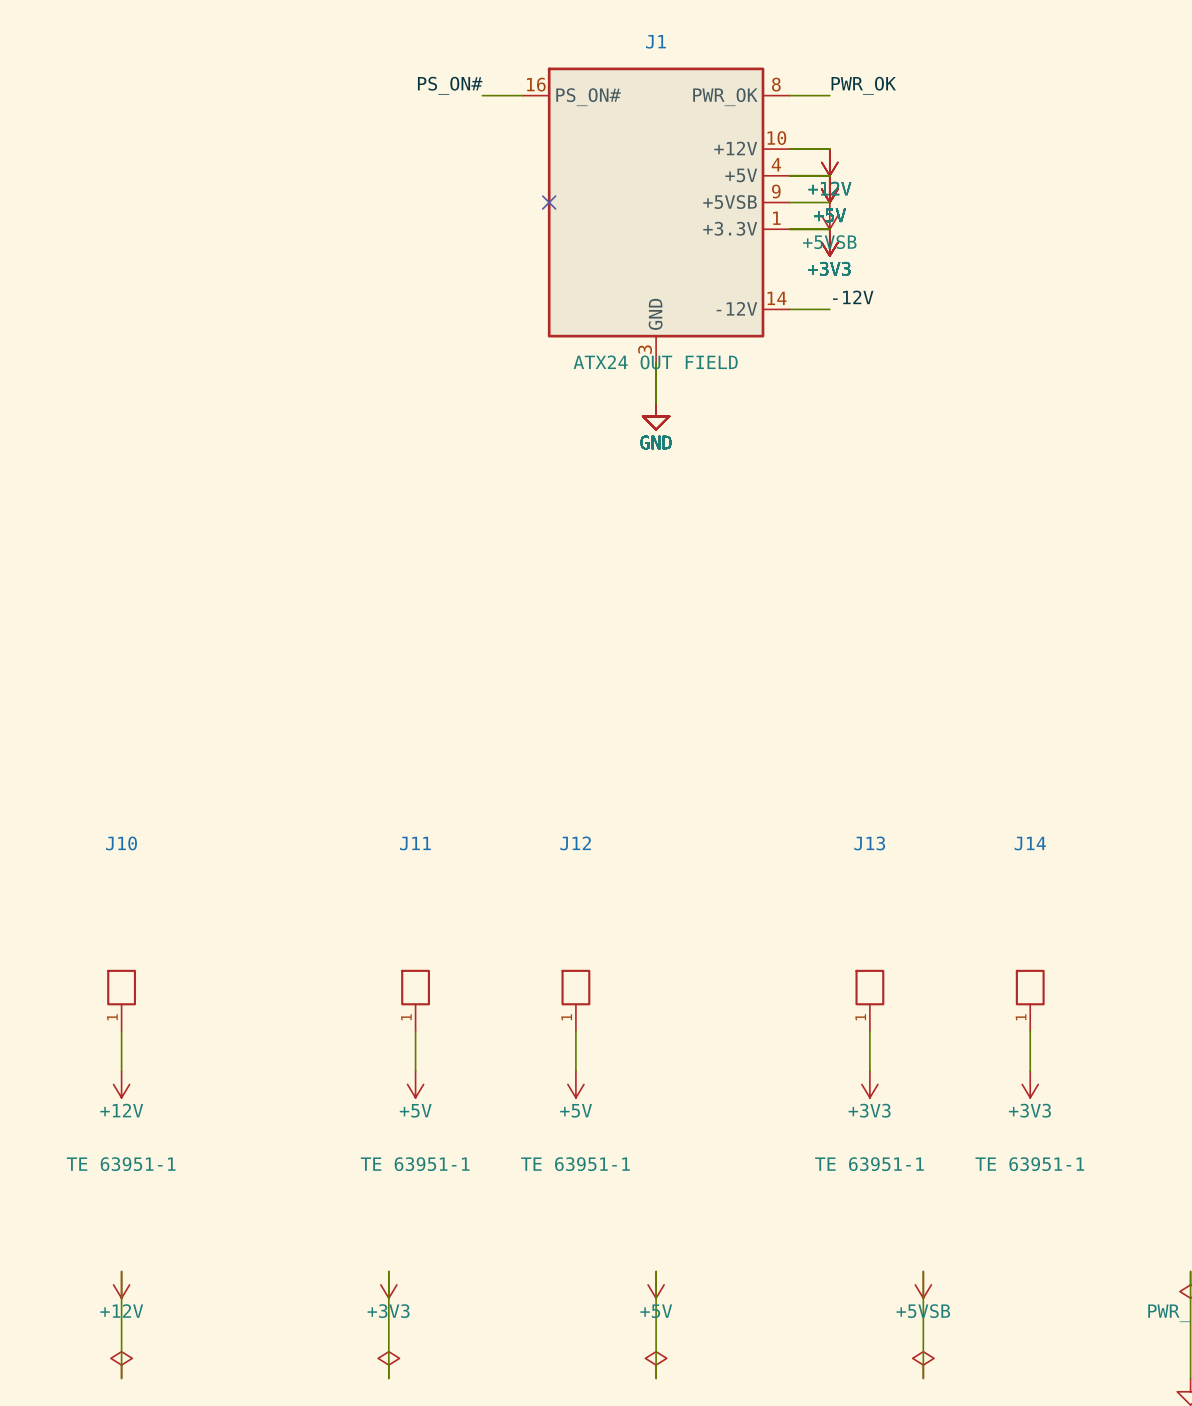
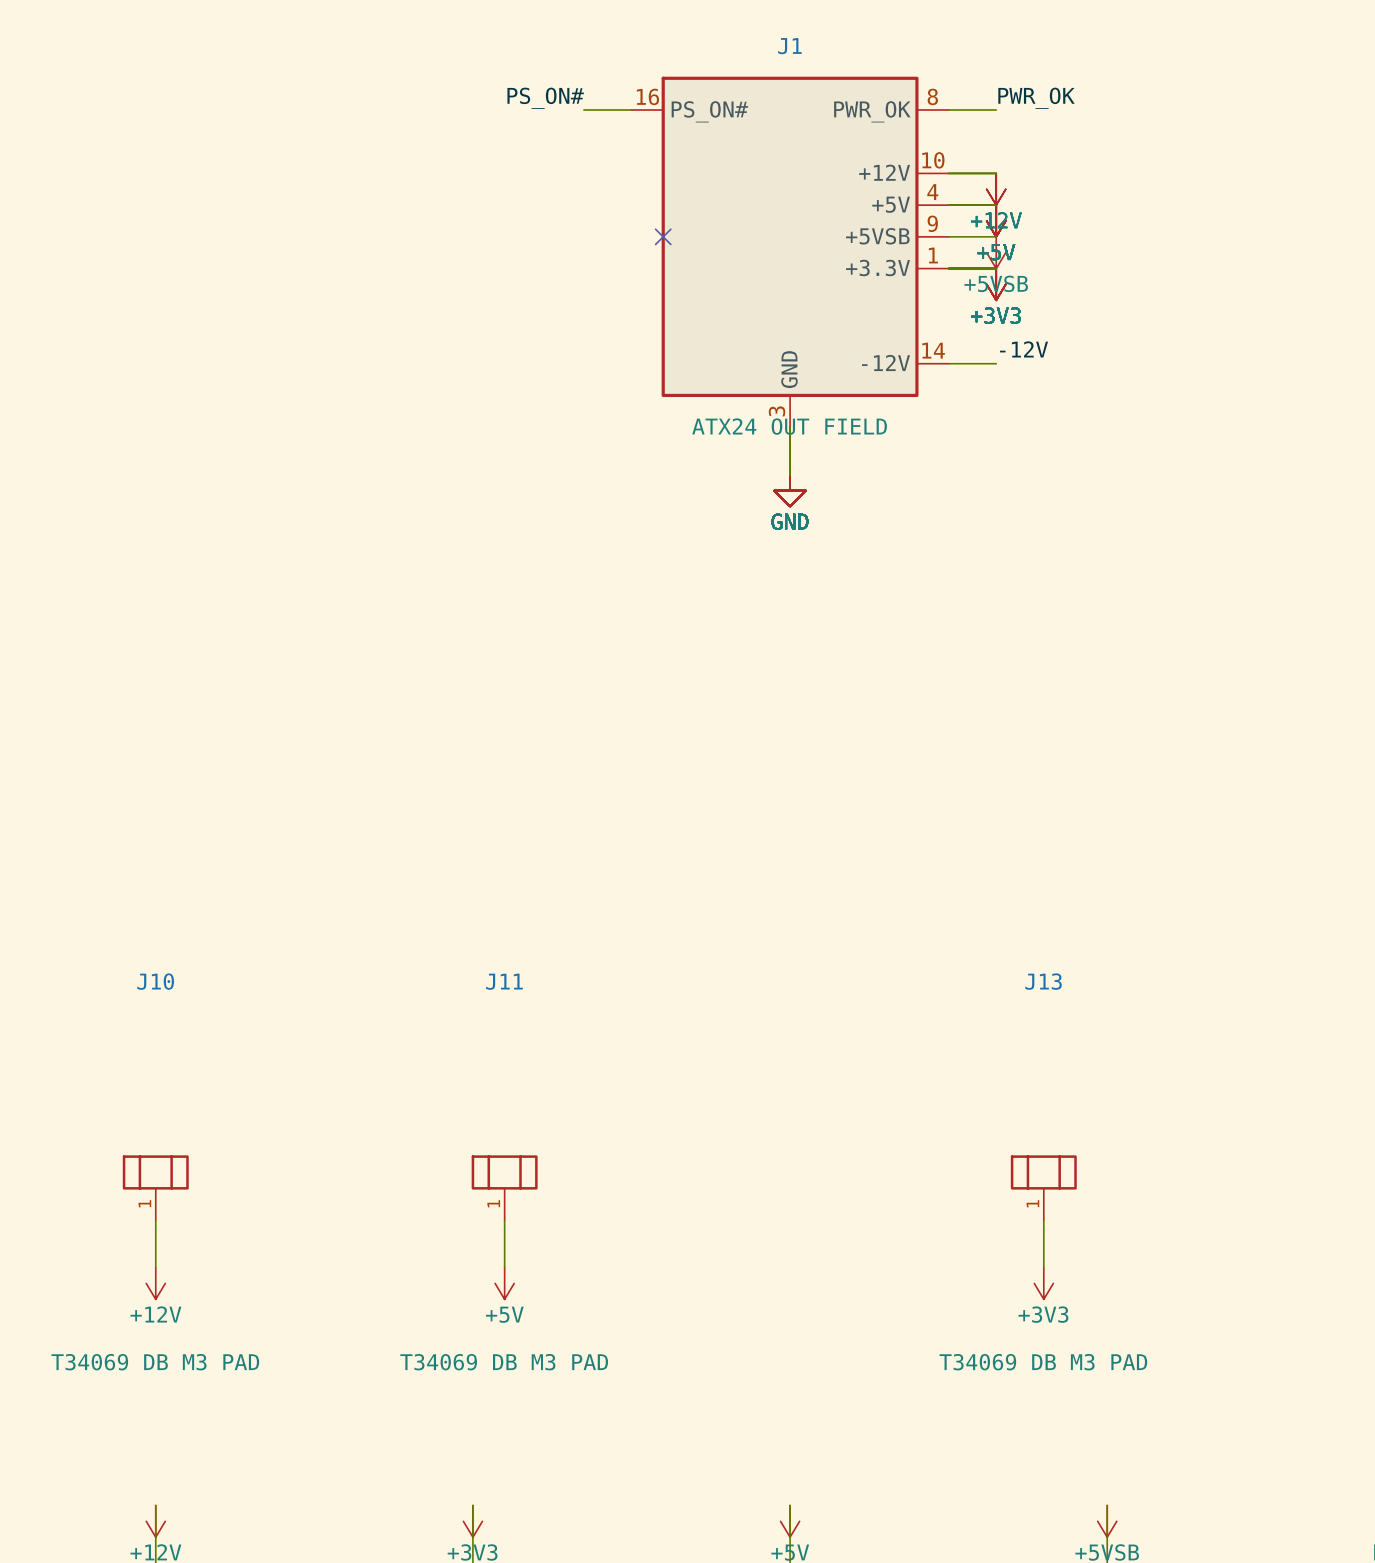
J10 symbol: [107, 969, 137, 1032] -> [122, 1155, 189, 1221]
J11 symbol: [401, 969, 431, 1032] -> [471, 1155, 538, 1221]
J13 symbol: [855, 969, 885, 1032] -> [1010, 1155, 1077, 1221]
J12: TE 63951-1 (575, 1000) -> none
J14: TE 63951-1 (1030, 1000) -> none
wire: (575, 1031) (575, 1071) -> none
wire: (1030, 1031) (1030, 1071) -> none
power symbol: +5V (575, 1084) -> none
power symbol: +3V3 (1030, 1084) -> none
J10 value: TE 63951-1 (121, 1164) -> T34069 DB M3 PAD (155, 1362)
J11 value: TE 63951-1 (415, 1164) -> T34069 DB M3 PAD (504, 1362)
J13 value: TE 63951-1 (869, 1164) -> T34069 DB M3 PAD (1043, 1362)

